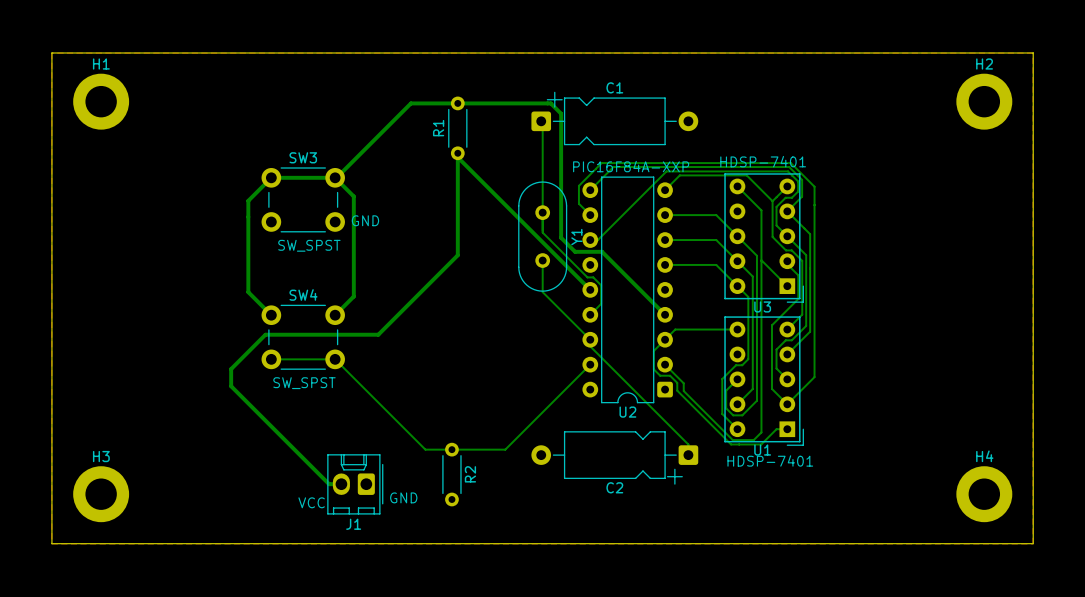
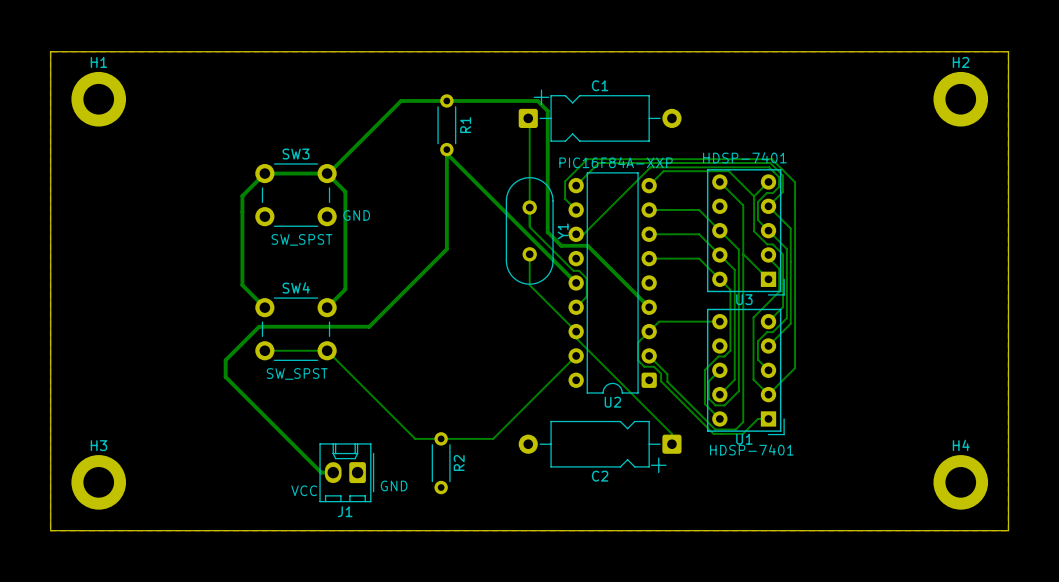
R1 name position: R1 (438, 128) -> R1 (465, 125)

